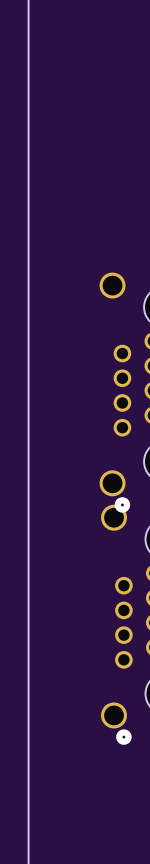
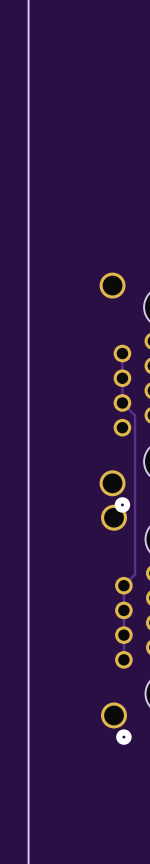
track: none -> (122, 353) (122, 402) (135, 415) (135, 574) (123, 585) (123, 659)

